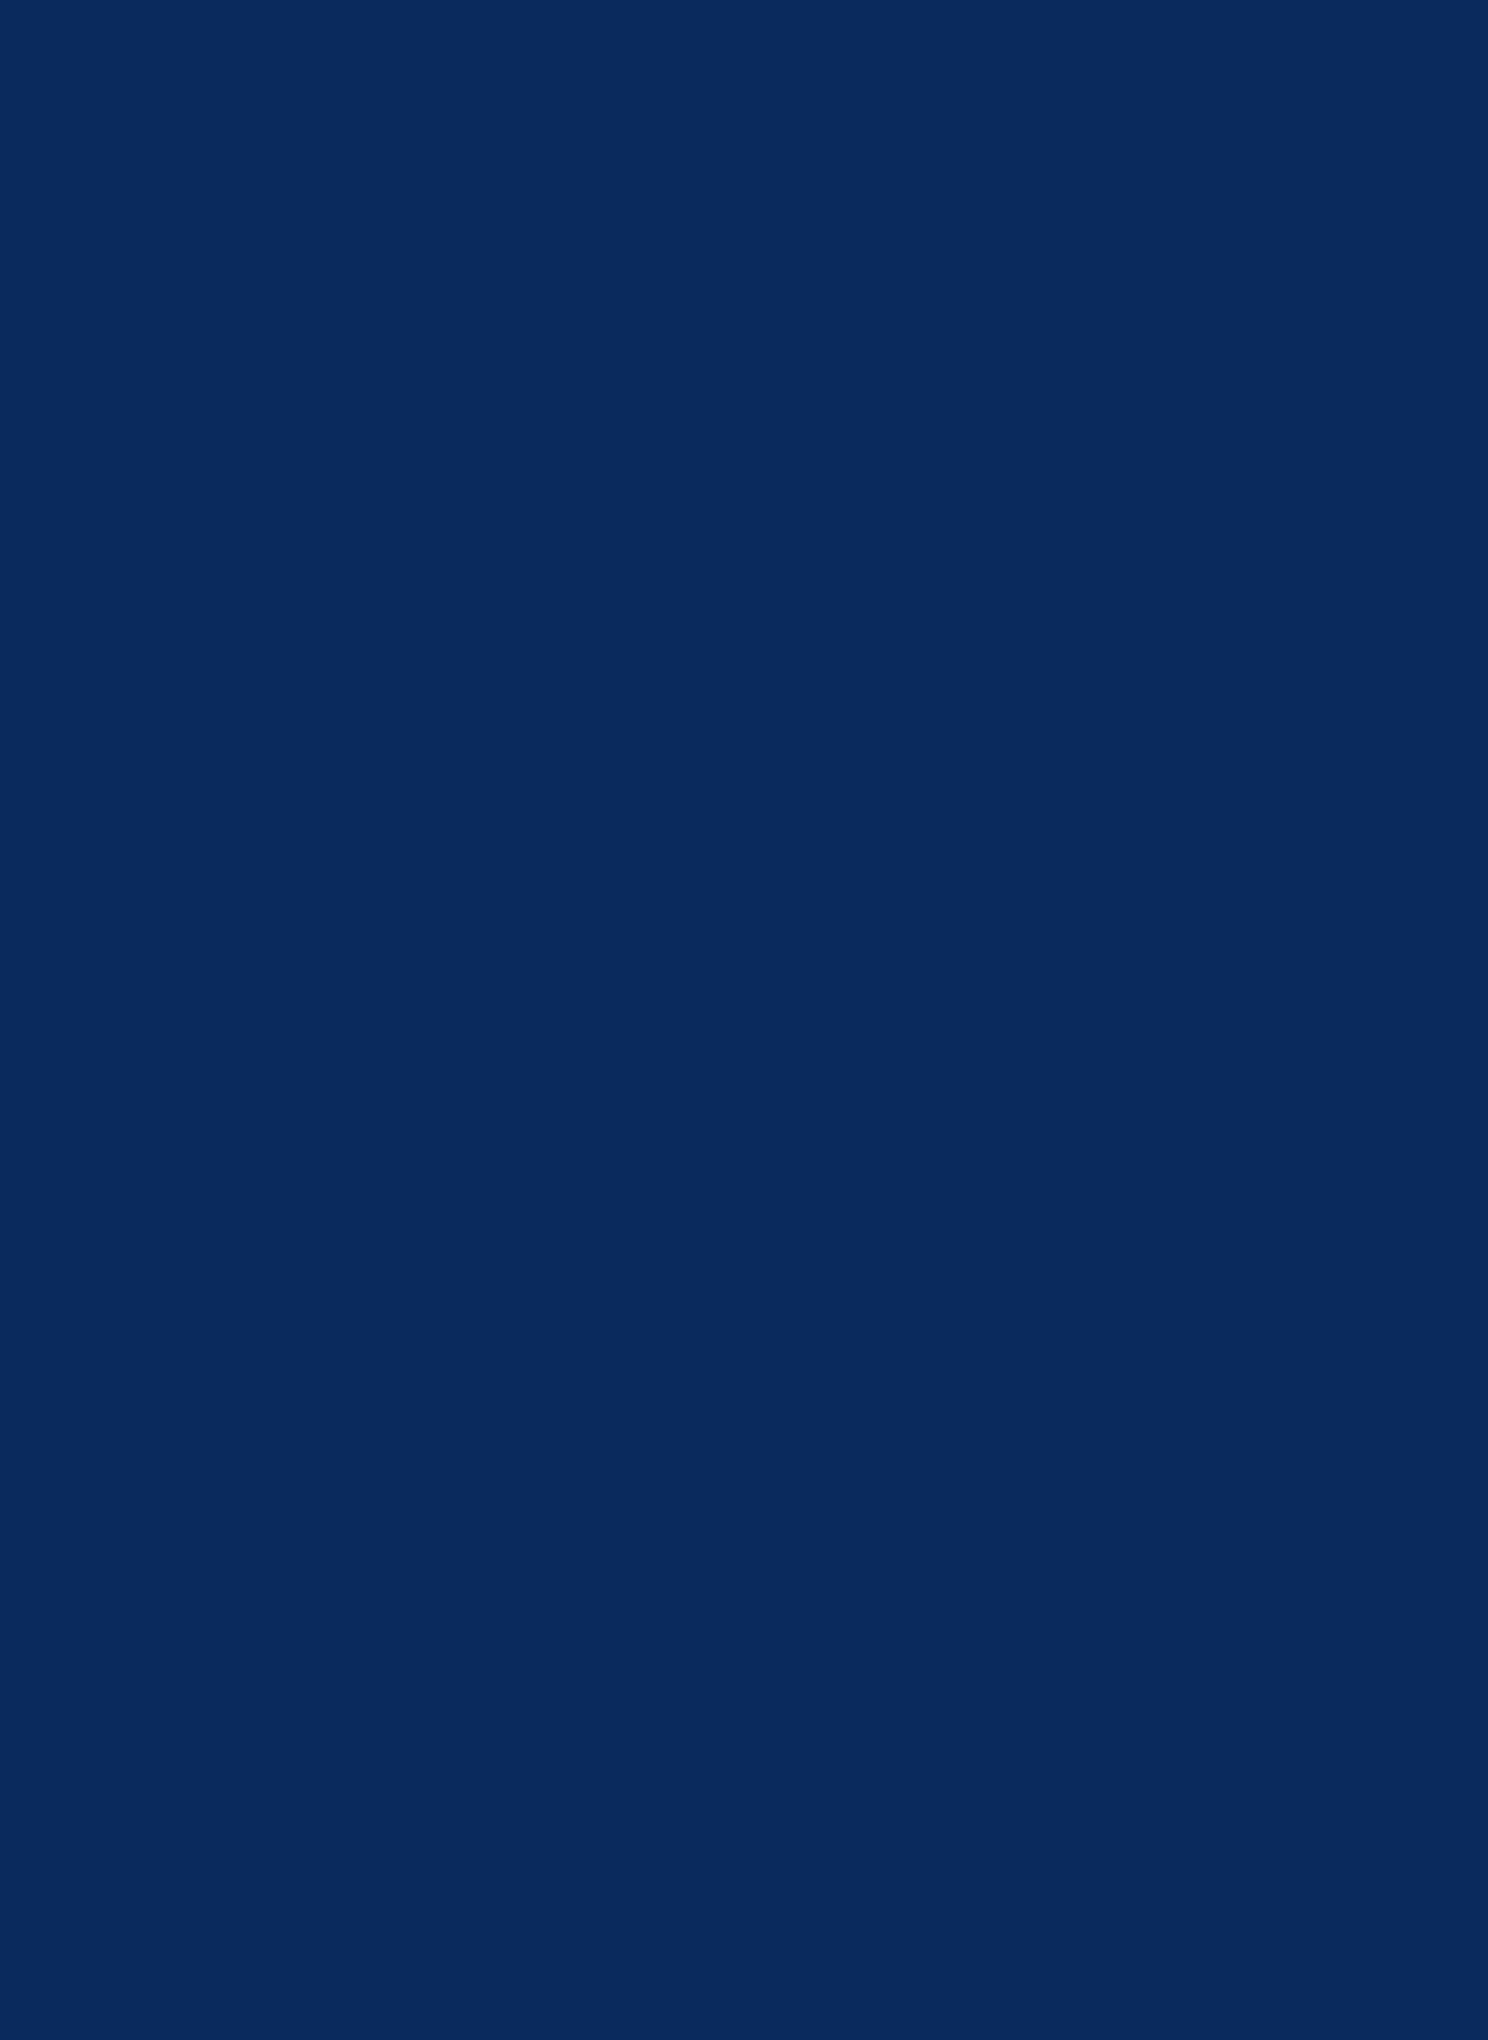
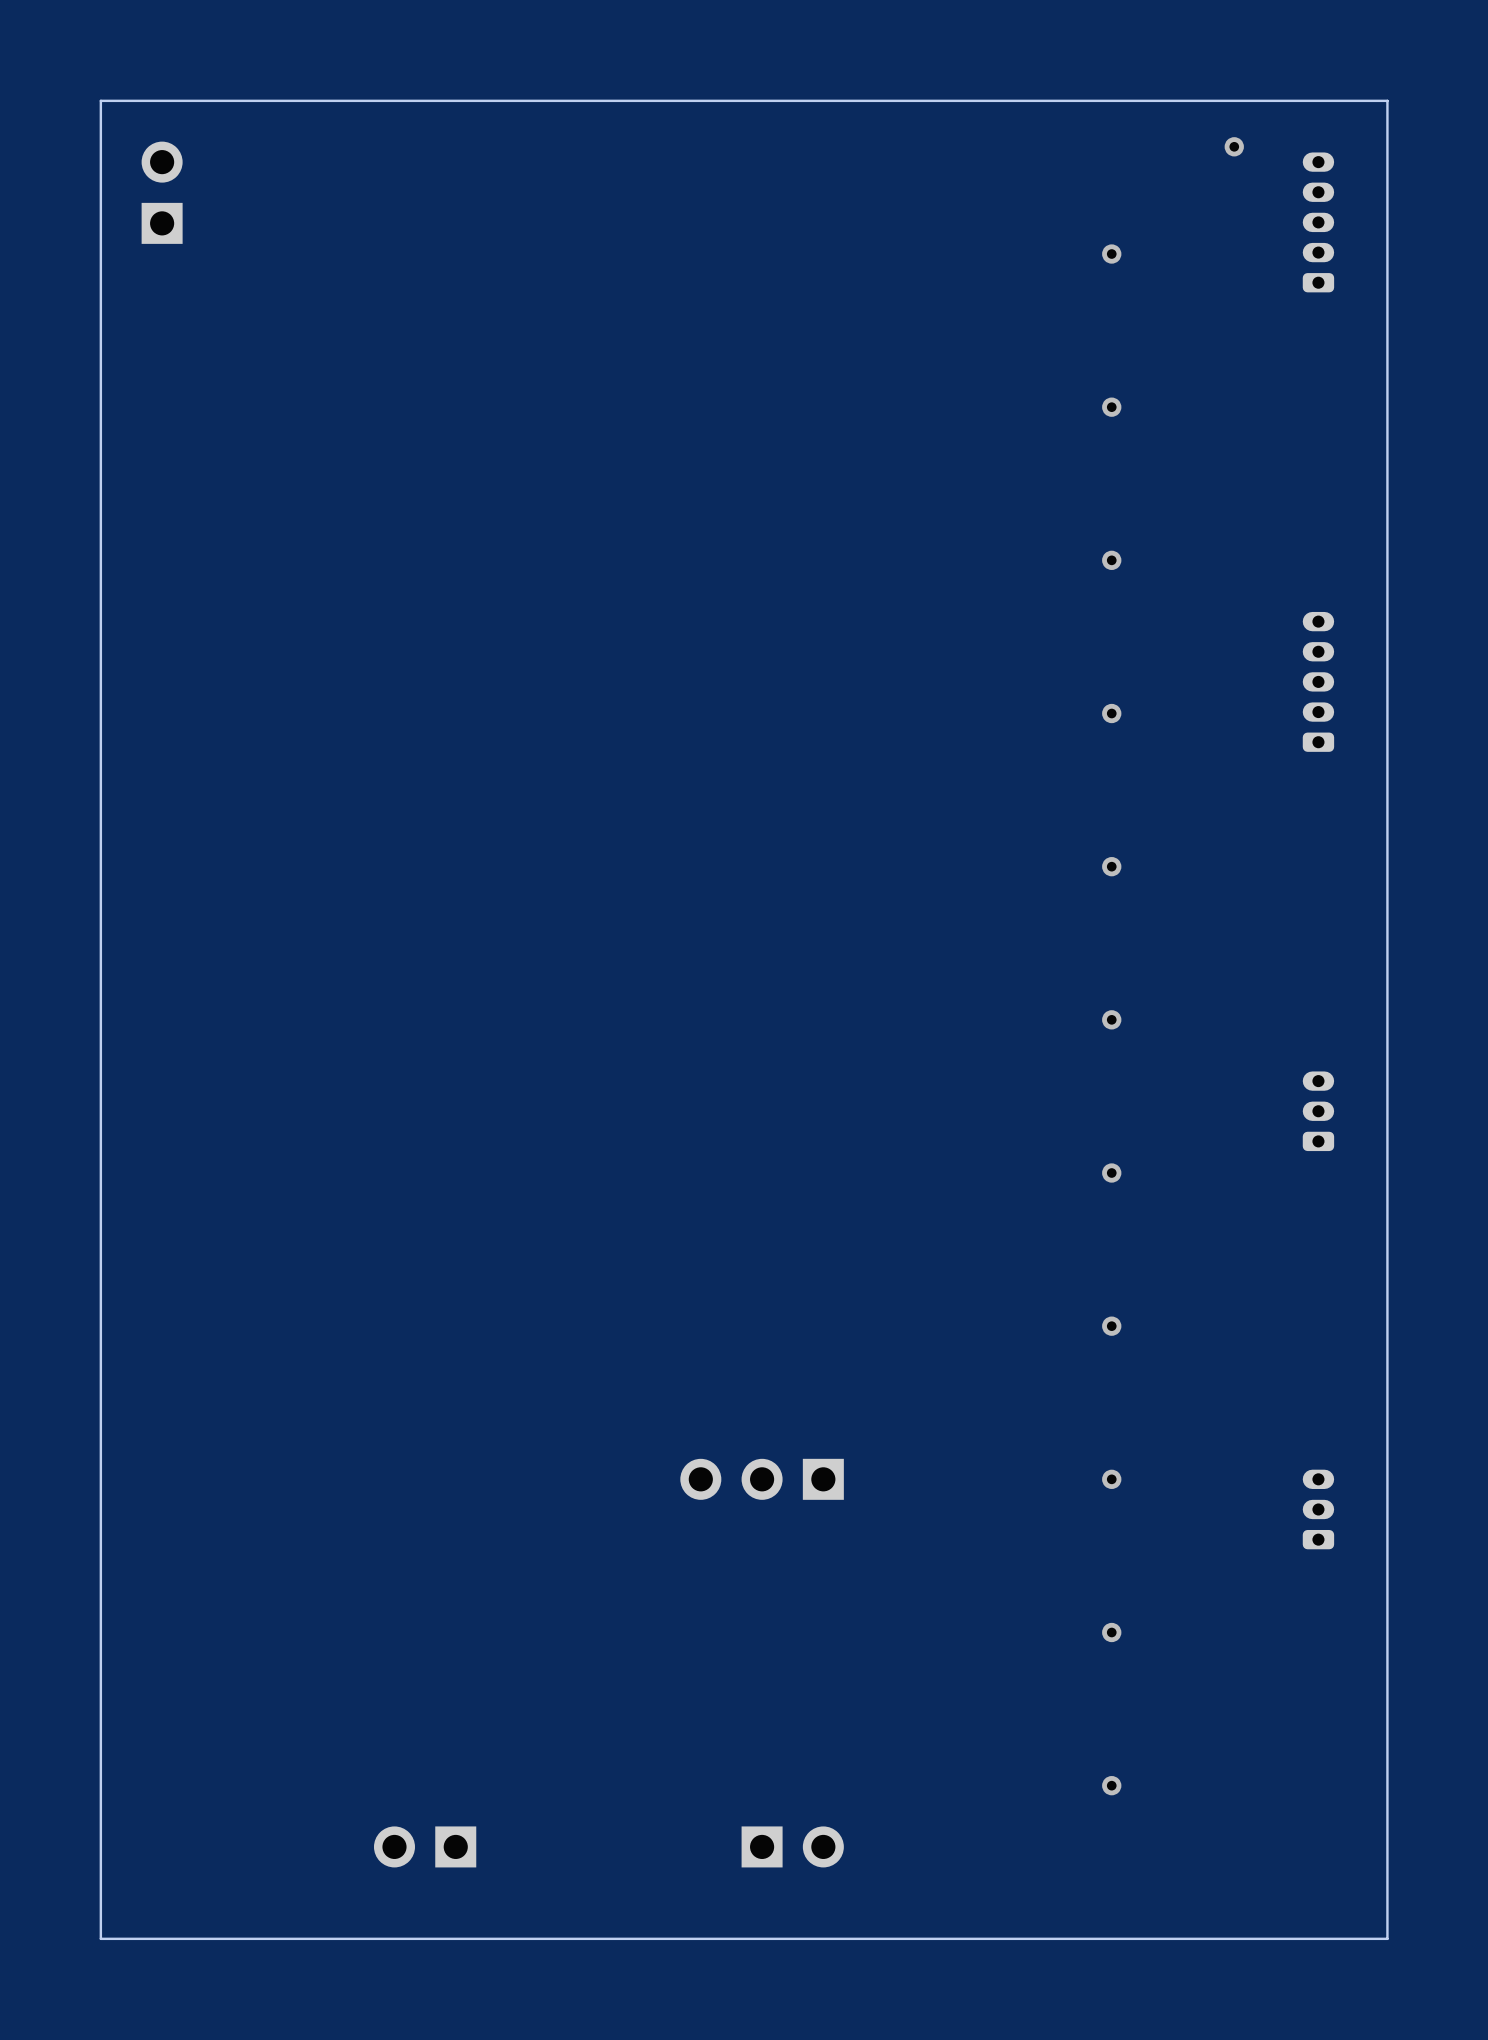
board edge: none -> (1387, 100) (100, 100) (100, 1938) (1387, 1938) (1387, 100)
via: none -> (1234, 146)
part: none -> (162, 192)
part: none -> (1318, 222)
via: none -> (1111, 254)
via: none -> (1111, 407)
via: none -> (1111, 560)
part: none -> (1318, 681)
via: none -> (1111, 713)
via: none -> (1111, 866)
via: none -> (1111, 1019)
part: none -> (1318, 1111)
via: none -> (1111, 1173)
via: none -> (1111, 1326)
part: none -> (762, 1479)
via: none -> (1111, 1479)
part: none -> (1318, 1509)
via: none -> (1111, 1632)
via: none -> (1111, 1785)
part: none -> (425, 1846)
part: none -> (792, 1846)

